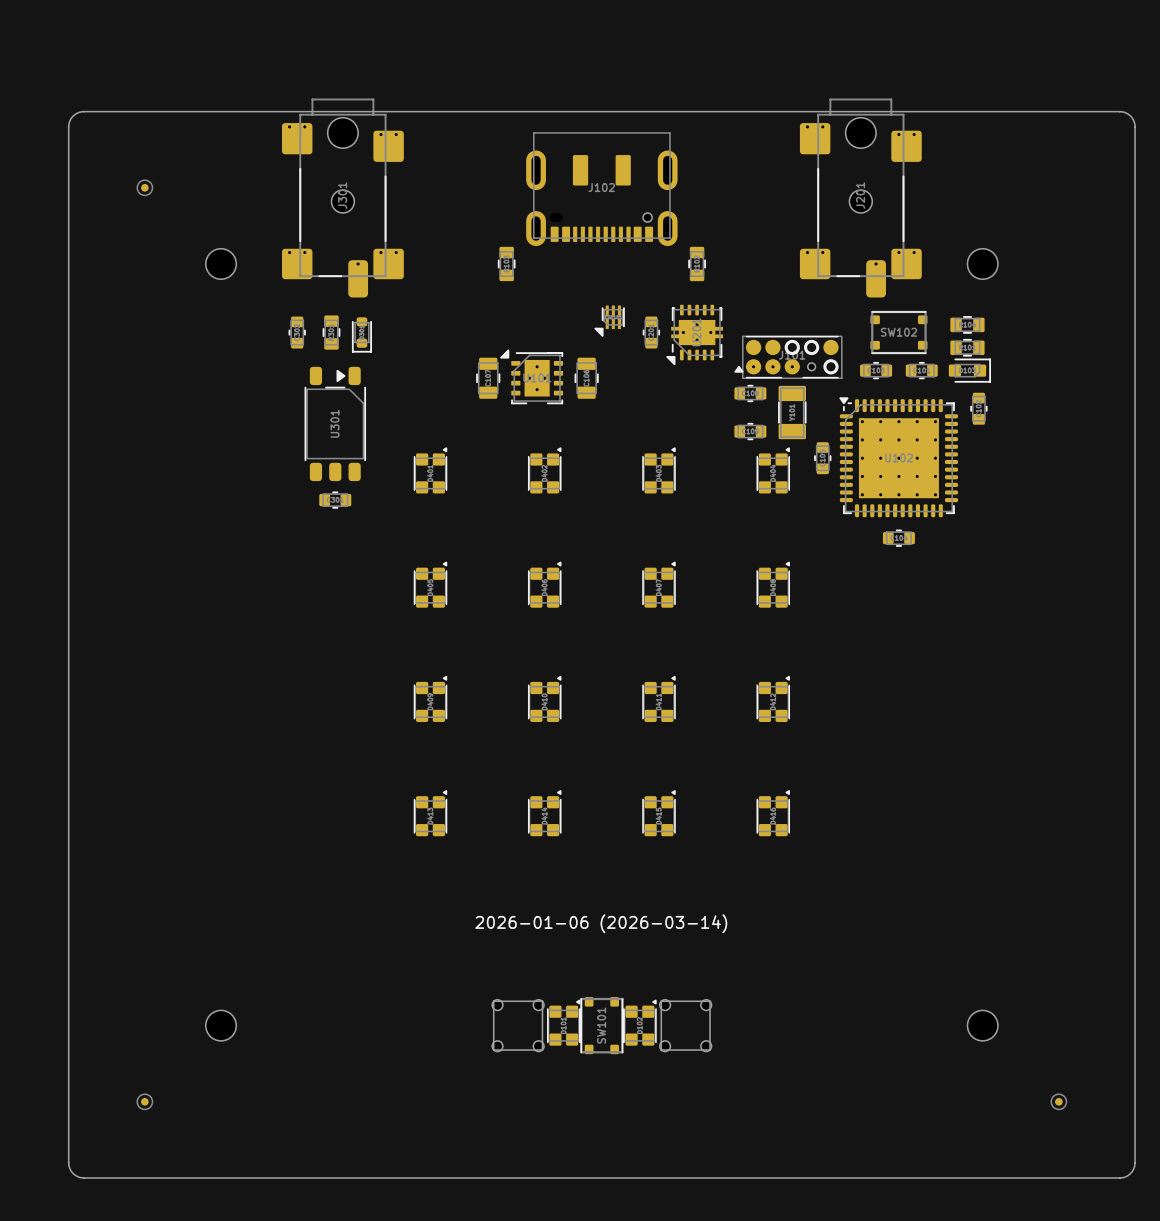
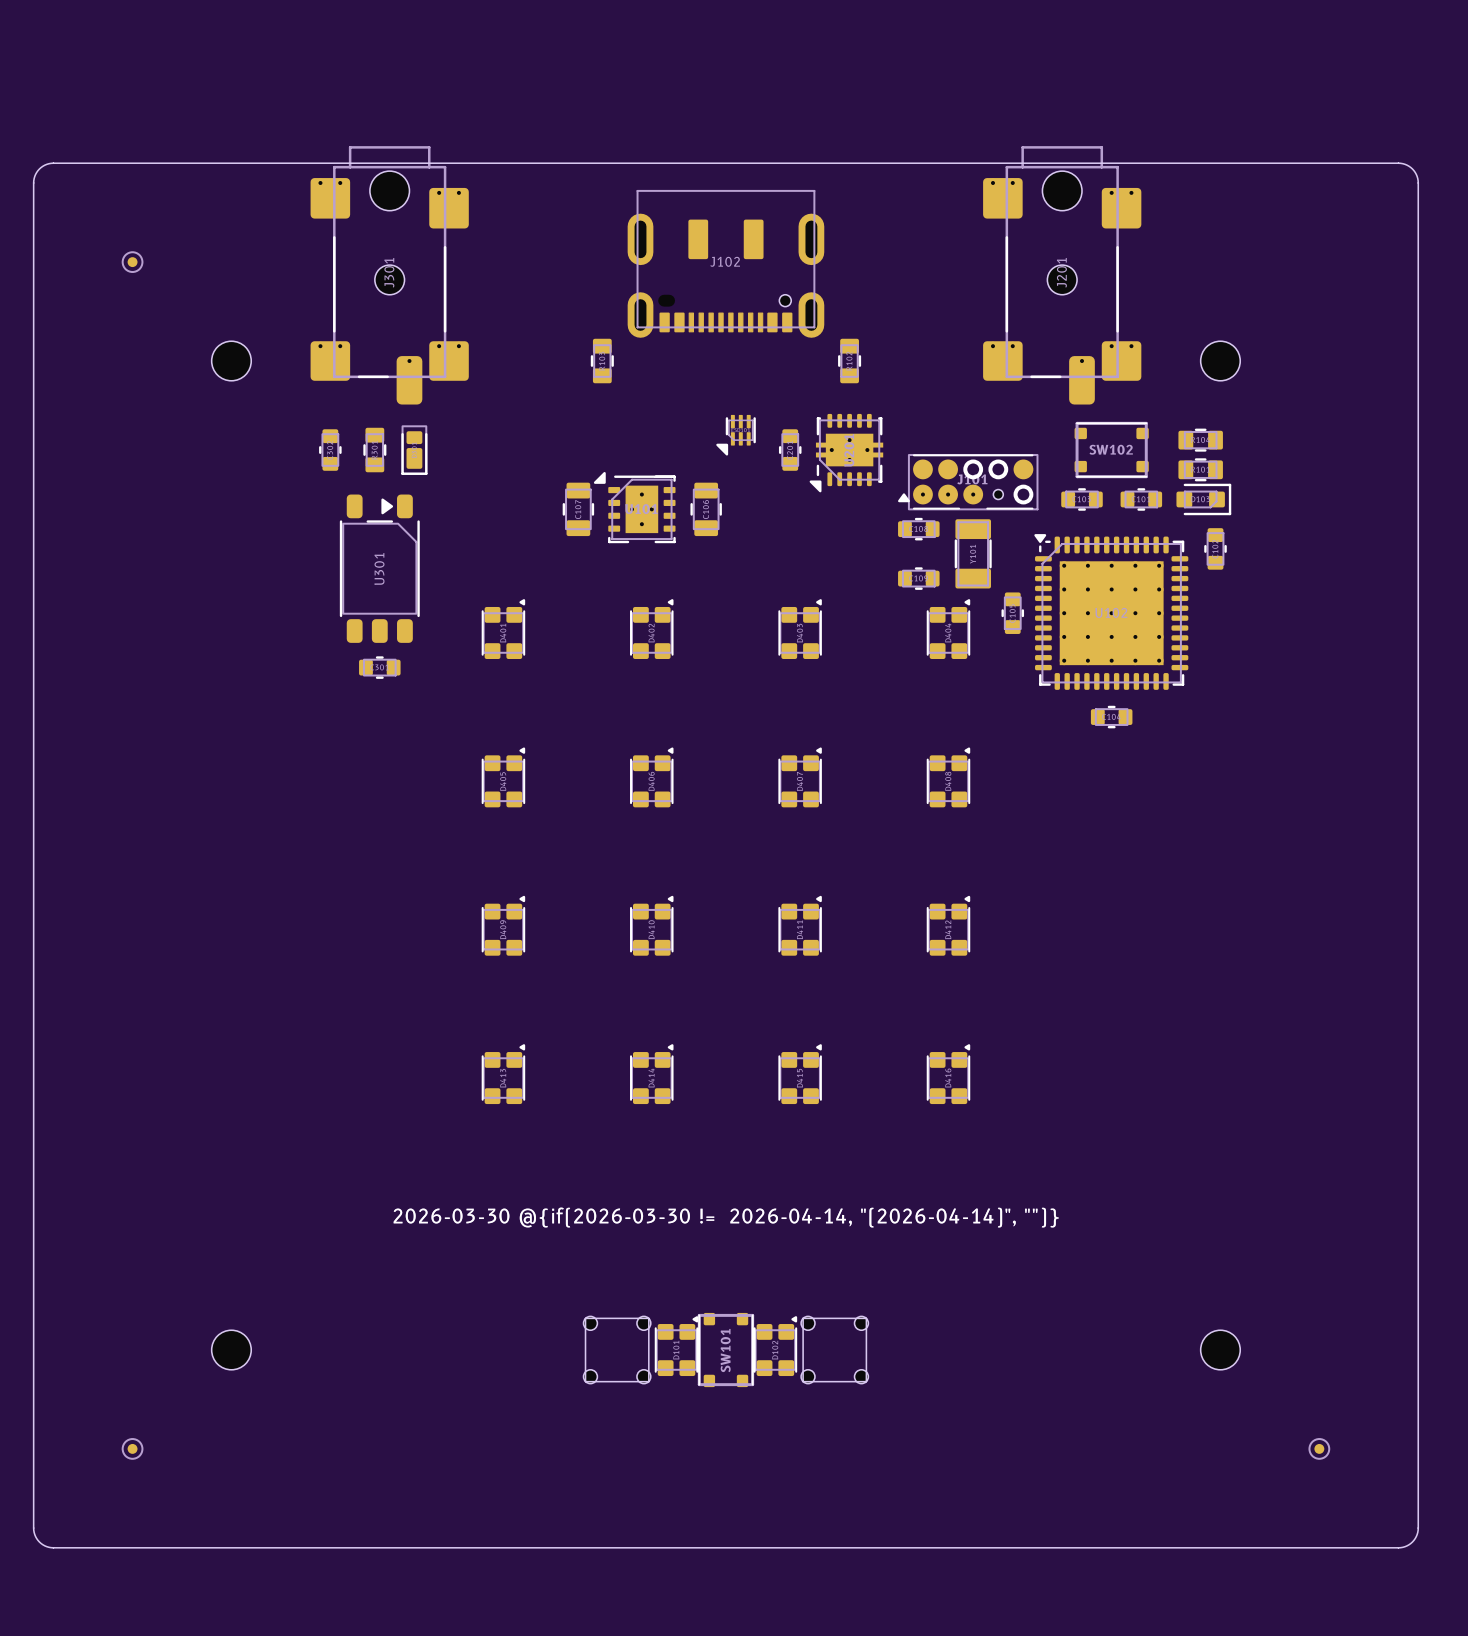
part footprint: [351, 317, 373, 353] -> [401, 425, 428, 475]
drawing shape: [475, 914, 728, 934] -> [393, 1207, 1059, 1228]

